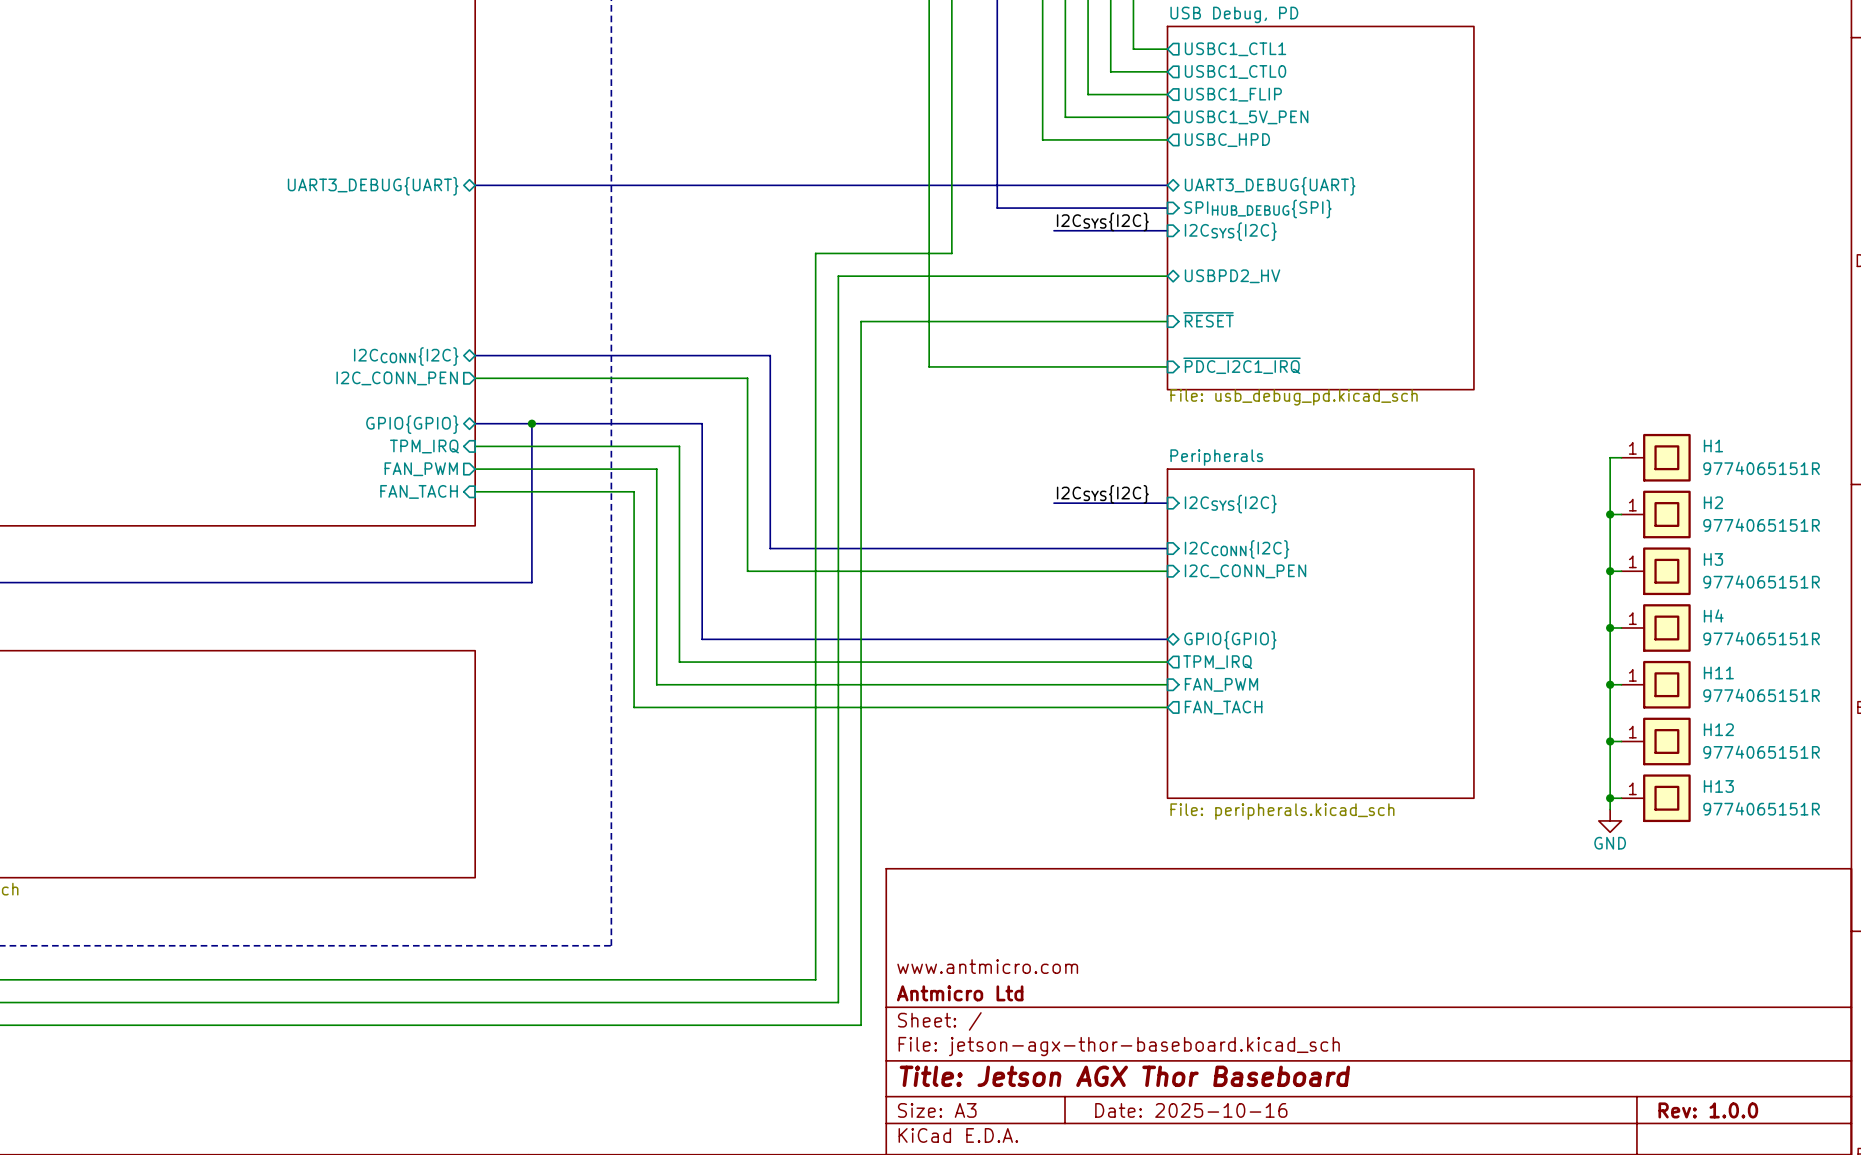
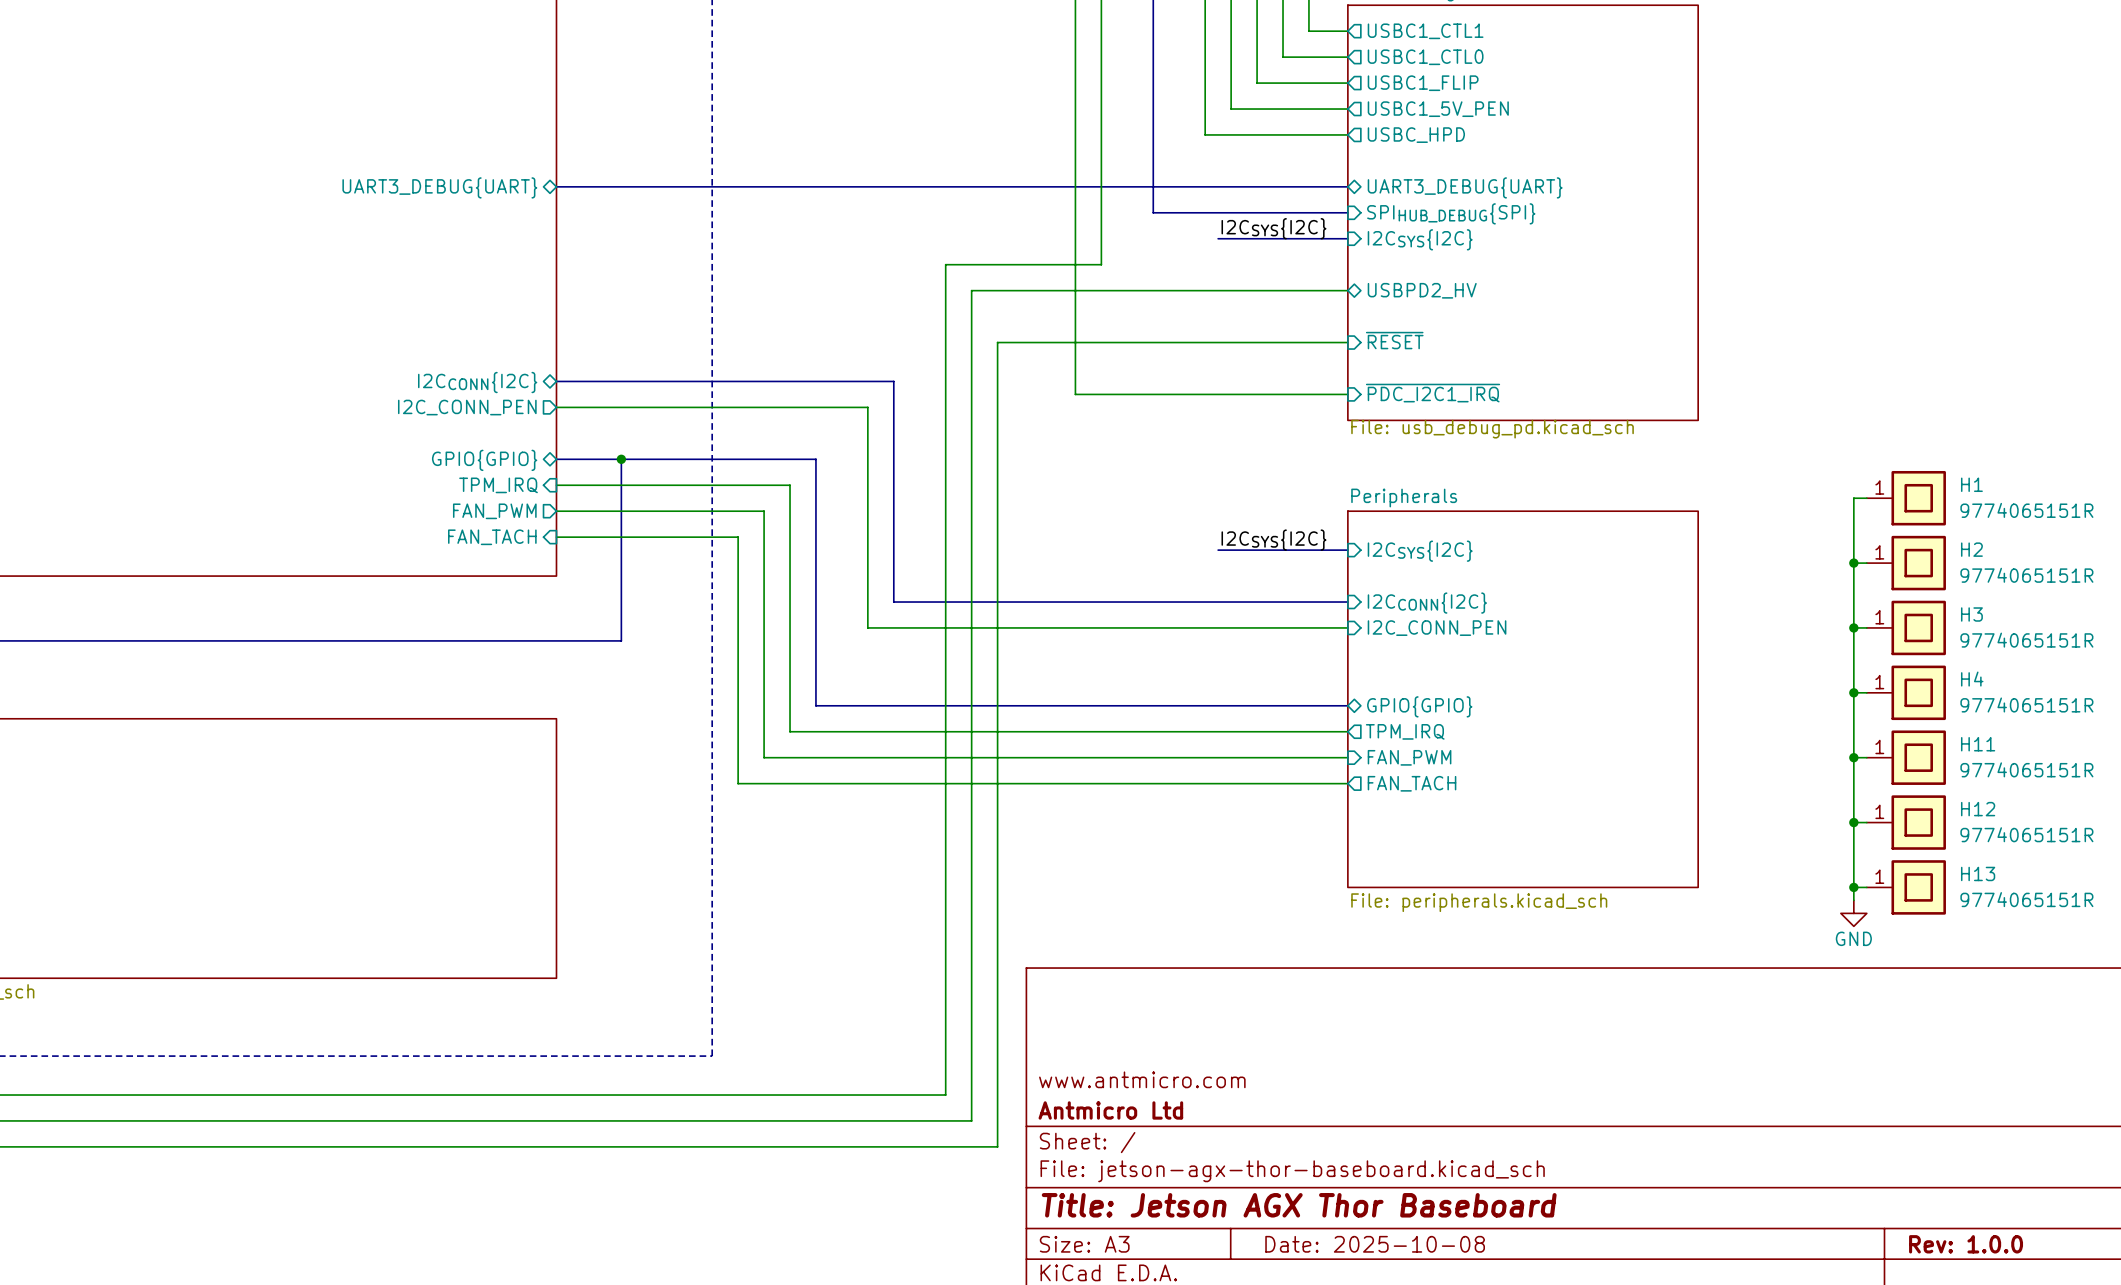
title block: Date: 2025-10-16 (1191, 1110) -> Date: 2025-10-08 (1375, 1244)

